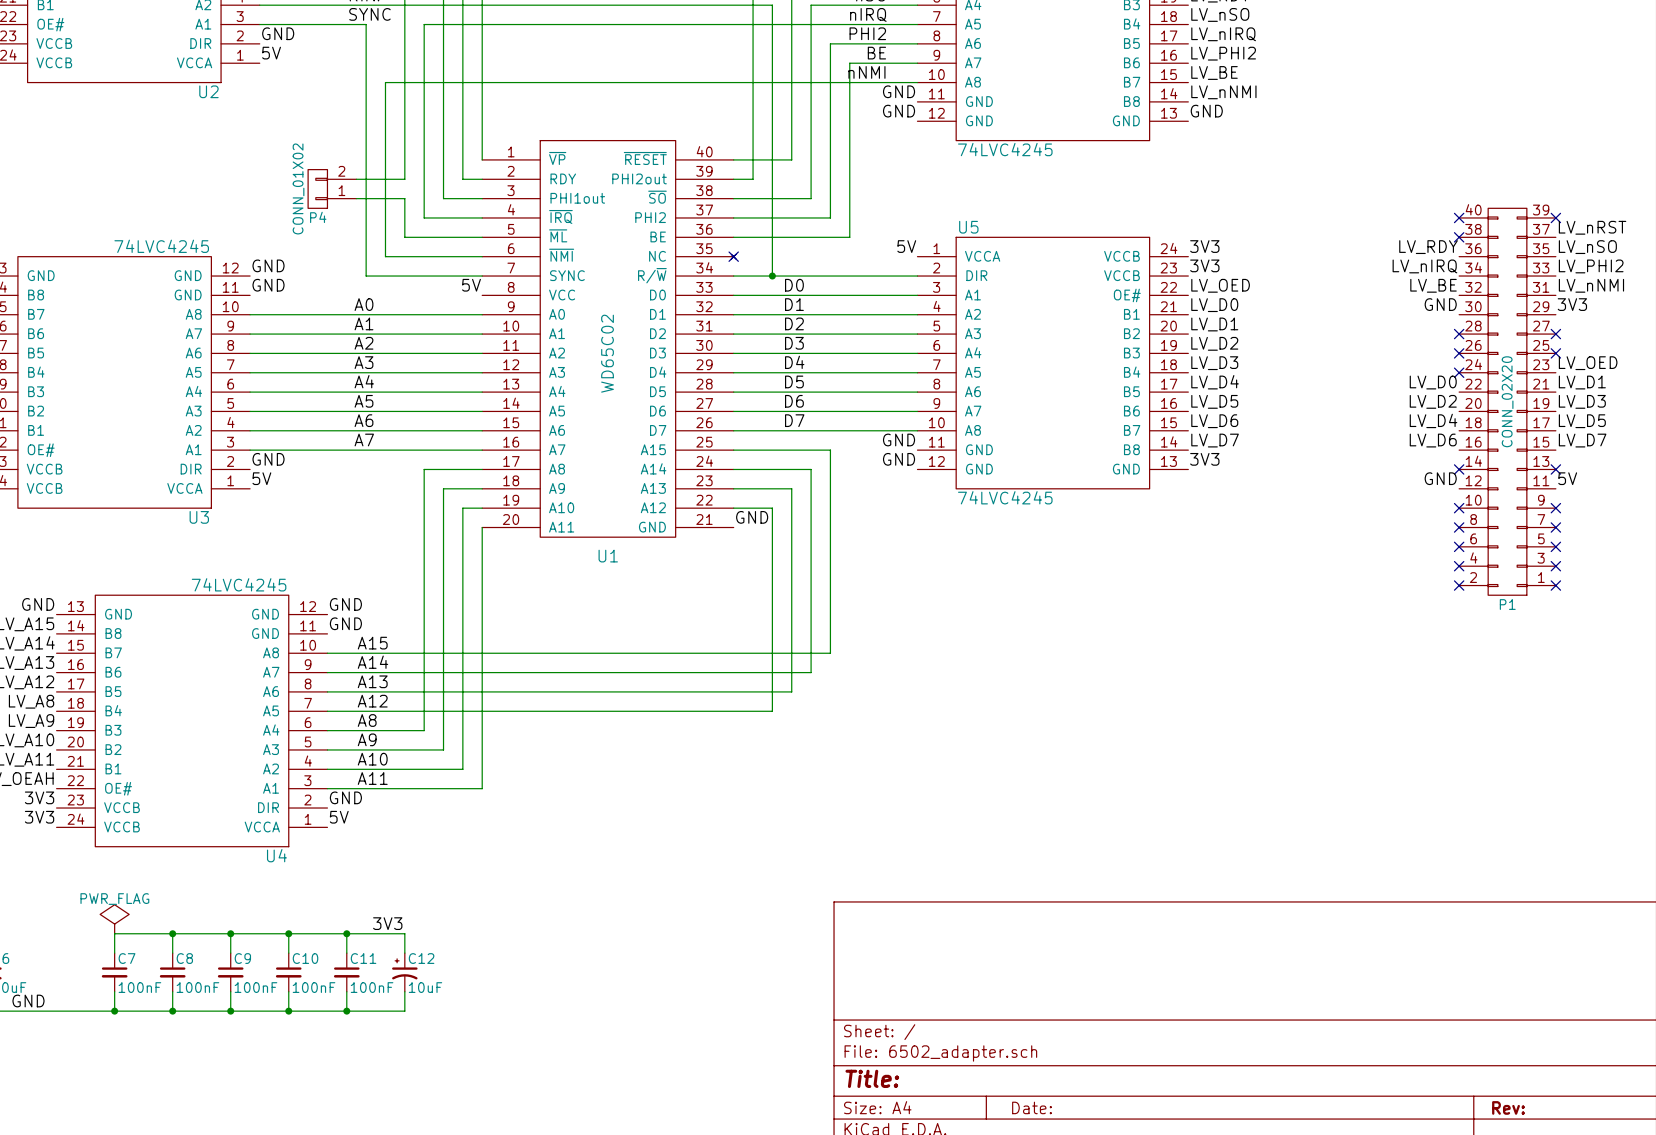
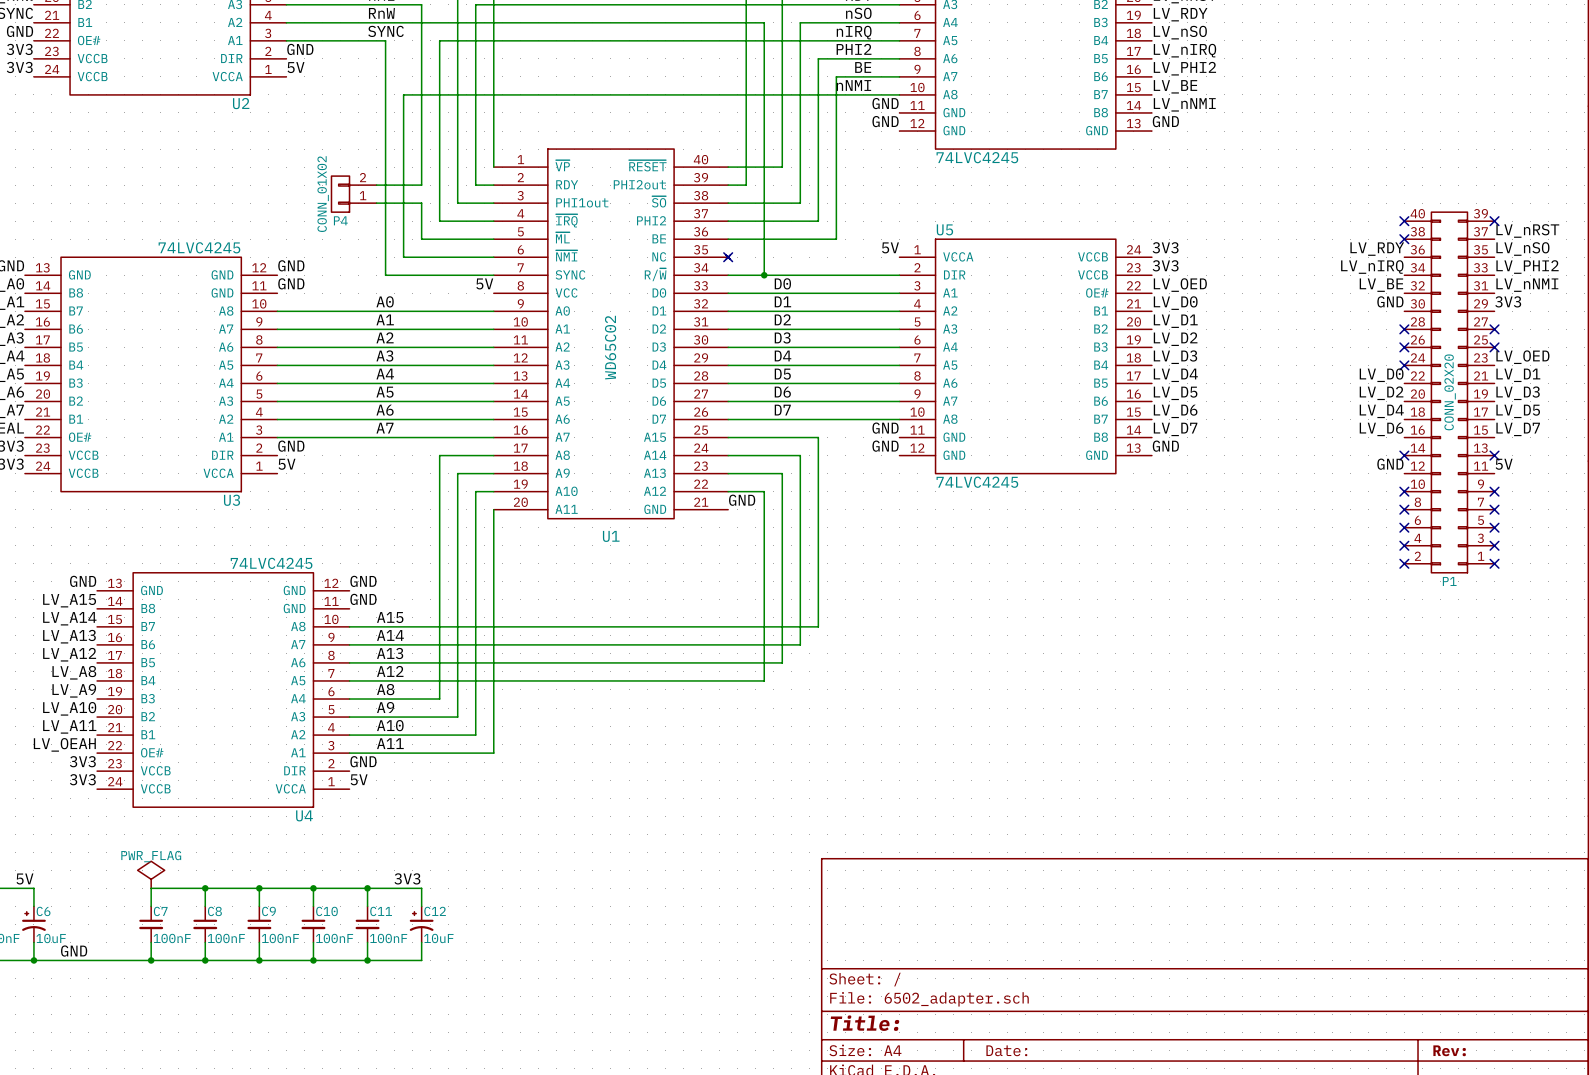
label: 3V3 (1204, 459) -> GND (1165, 446)

